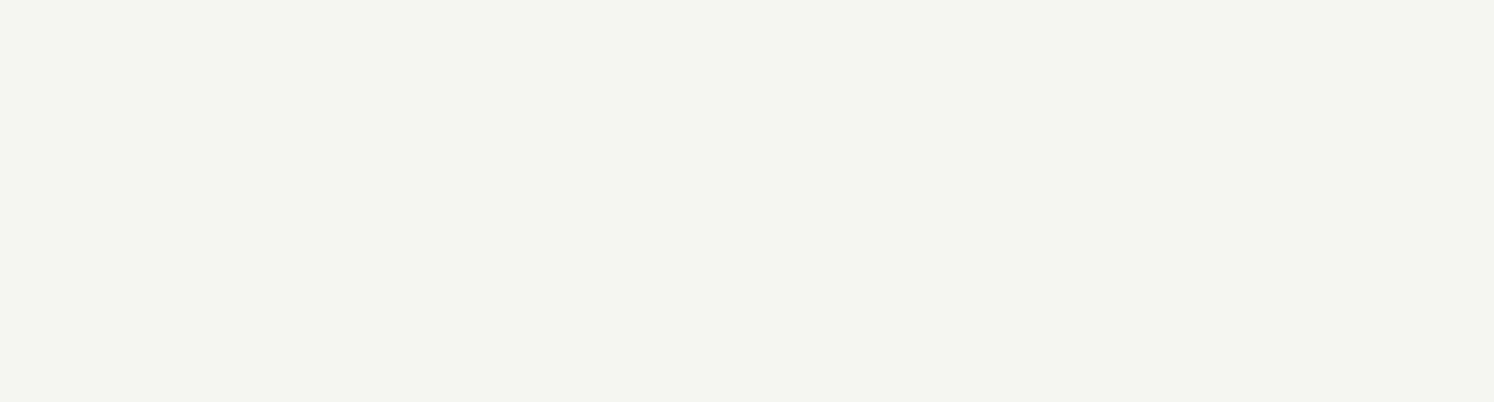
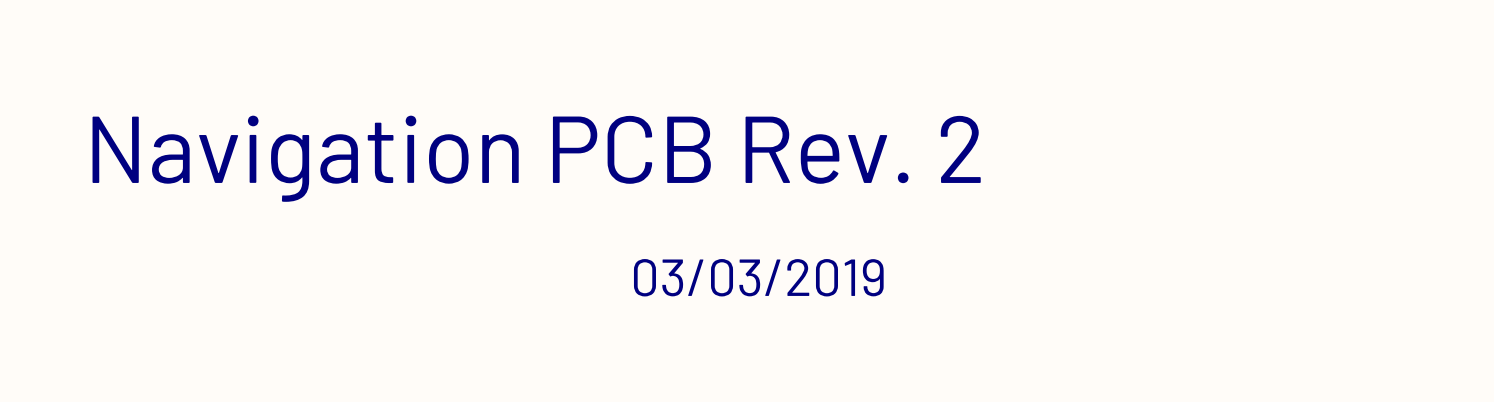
text: none -> Navigation PCB Rev. 2 (536, 158)
text: none -> 03/03/2019 (758, 277)

